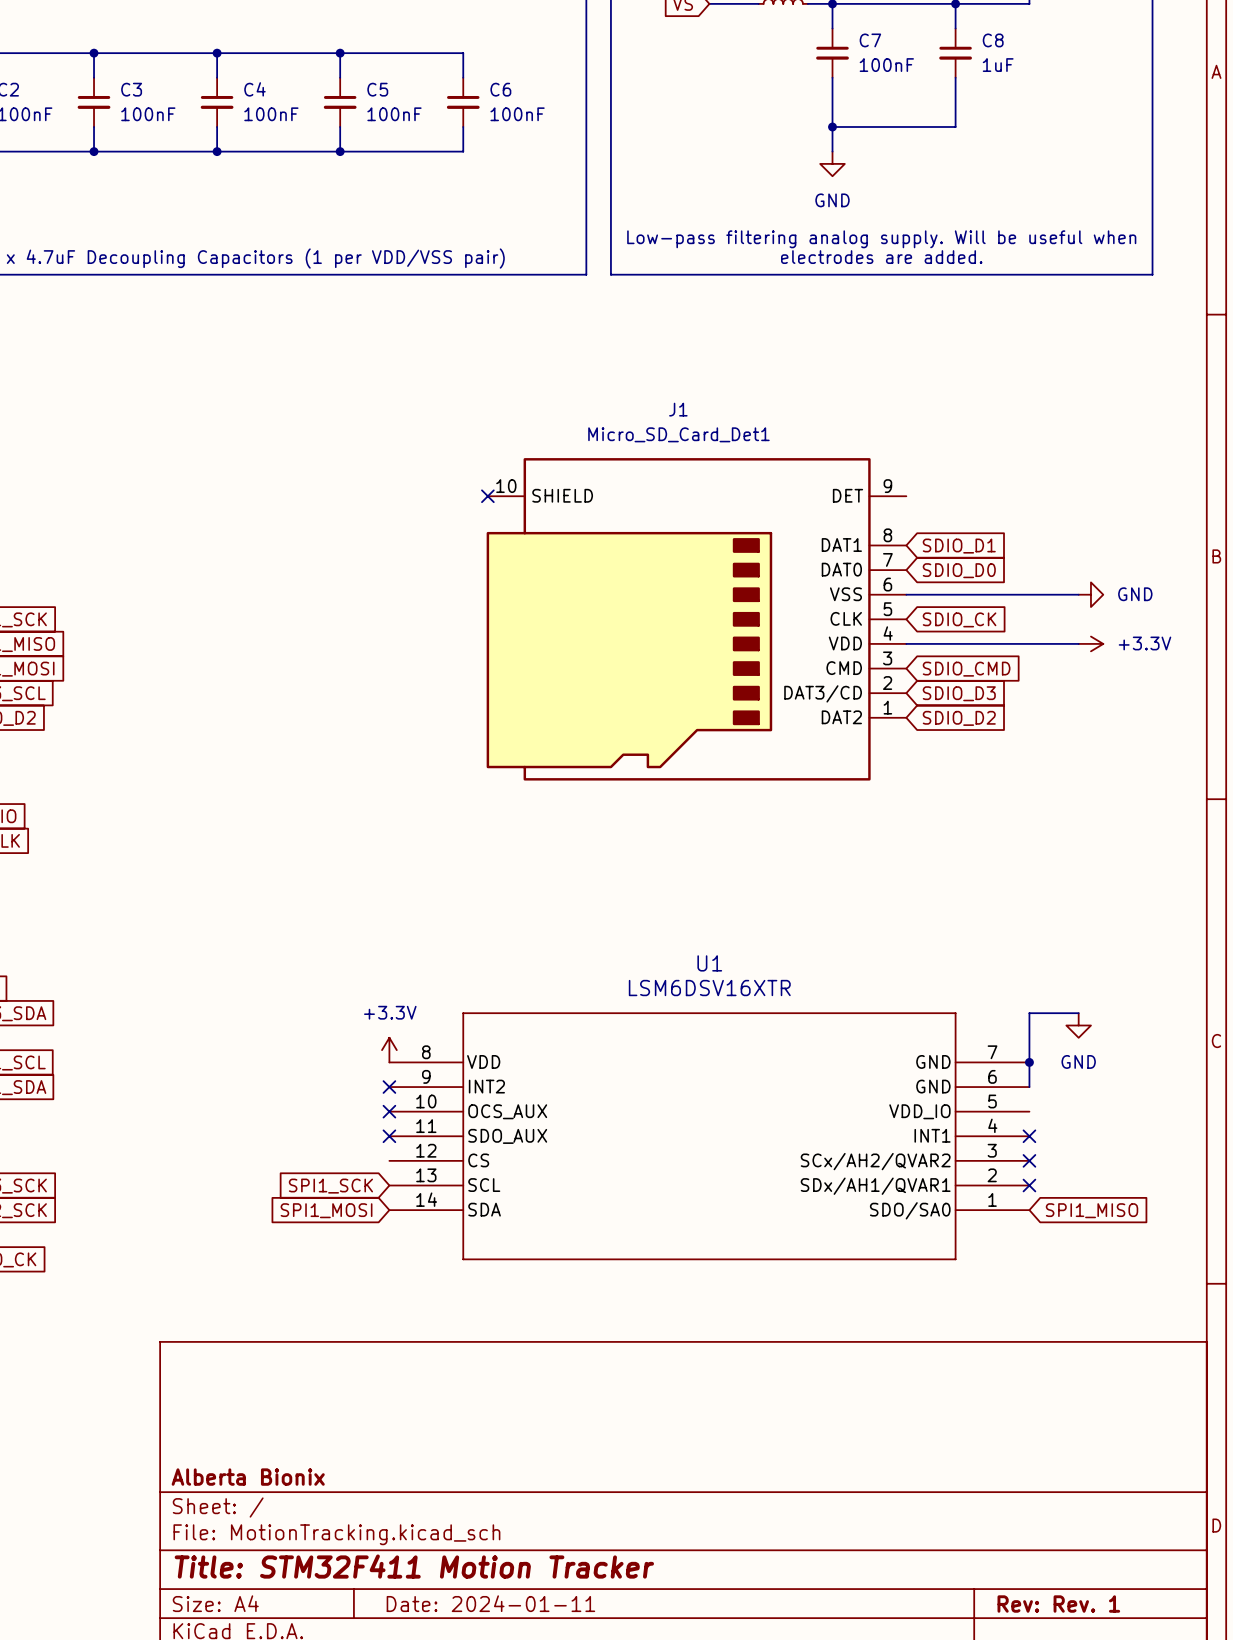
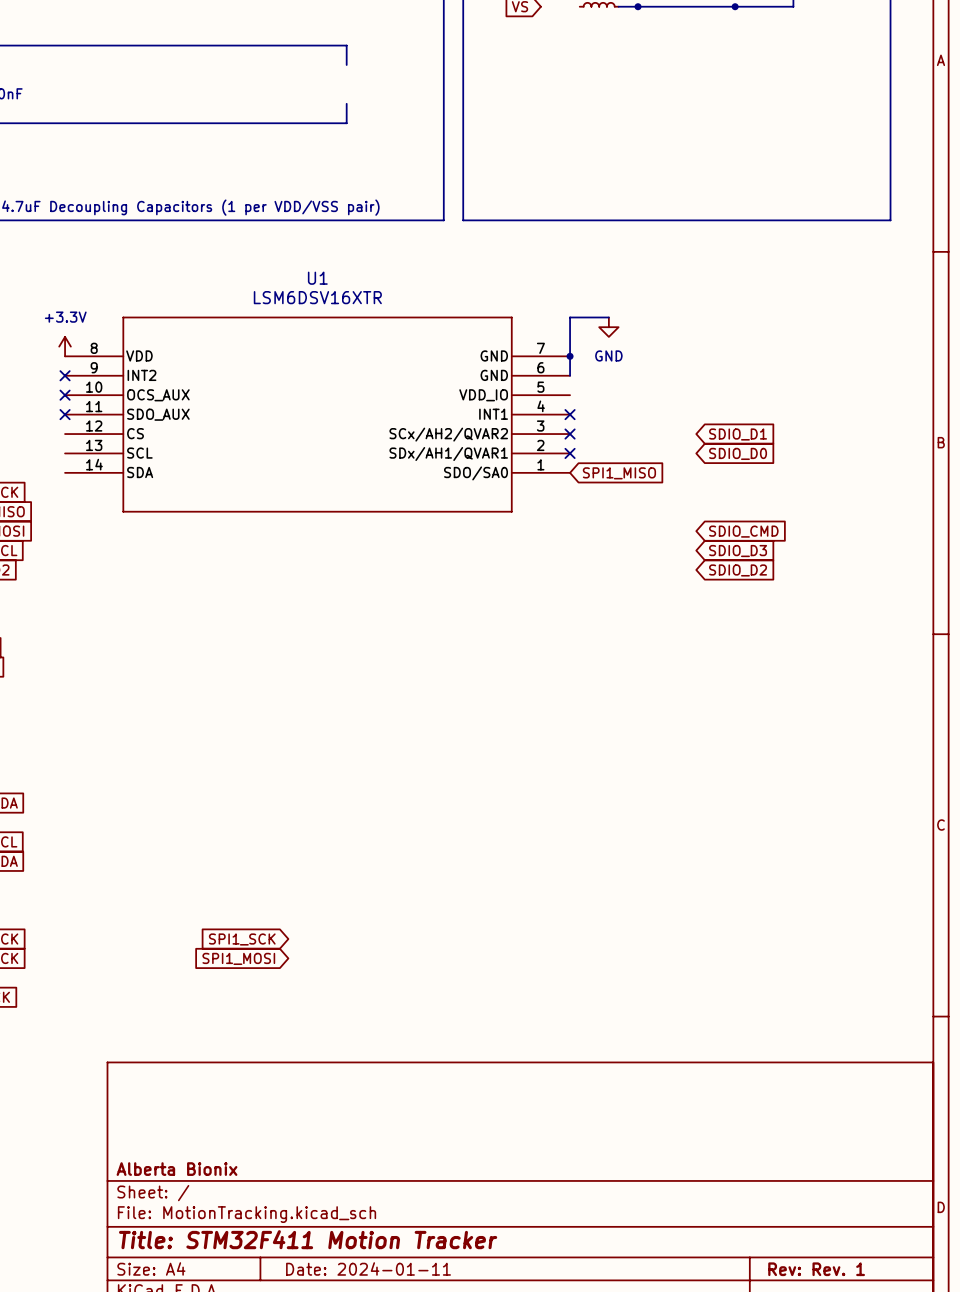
wire: (709, 3) (758, 3) -> none
wire: (832, 3) (832, 28) -> none
wire: (955, 3) (955, 28) -> none
wire: (94, 53) (94, 77) -> none
junction: (94, 53) -> none
wire: (217, 53) (217, 77) -> none
junction: (217, 53) -> none
wire: (340, 53) (340, 77) -> none
junction: (340, 53) -> none
C7: 100nF (832, 53) -> none
C8: 1uF (955, 53) -> none
wire: (832, 77) (832, 151) -> none
wire: (955, 77) (955, 126) (832, 126) -> none
C3: 100nF (94, 102) -> none
C4: 100nF (217, 102) -> none
C5: 100nF (340, 102) -> none
C6: 100nF (463, 102) -> none
wire: (94, 126) (94, 151) -> none
wire: (217, 126) (217, 151) -> none
wire: (340, 126) (340, 151) -> none
junction: (832, 126) -> none
junction: (94, 151) -> none
junction: (217, 151) -> none
junction: (340, 151) -> none
power symbol: GND (832, 163) -> none
text: Low-pass filtering analog supply. Will be useful when (881, 239) -> none
text: electrodes are added. (881, 257) -> none
wire: none -> (608, 317) (570, 317) (570, 375)
power symbol: none -> GND (608, 327)
power symbol: none -> +3.3V (65, 346)
junction: none -> (570, 356)
no-connect mark: none -> (65, 375)
no-connect mark: none -> (65, 395)
no-connect mark: (487, 496) -> none
no-connect mark: none -> (65, 414)
no-connect mark: none -> (570, 414)
no-connect mark: none -> (570, 434)
no-connect mark: none -> (570, 453)
wire: (906, 594) (1078, 594) -> none
power symbol: GND (1090, 594) -> none
global label: none -> SPI1_MISO (619, 473)
J1: Micro_SD_Card_Det1 (696, 619) -> none
global label: SDIO_CK (959, 619) -> none
wire: (906, 643) (1078, 643) -> none
power symbol: +3.3V (1090, 643) -> none
wire: (1078, 1013) (1029, 1013) (1029, 1087) -> none
power symbol: GND (1078, 1025) -> none
power symbol: +3.3V (389, 1050) -> none
junction: (1029, 1062) -> none
no-connect mark: (389, 1087) -> none
no-connect mark: (389, 1111) -> none
no-connect mark: (389, 1136) -> none
U1 position: (709, 1136) -> (317, 414)
no-connect mark: (1029, 1136) -> none
no-connect mark: (1029, 1160) -> none
no-connect mark: (1029, 1185) -> none
global label: SPI1_MISO (1092, 1210) -> none

